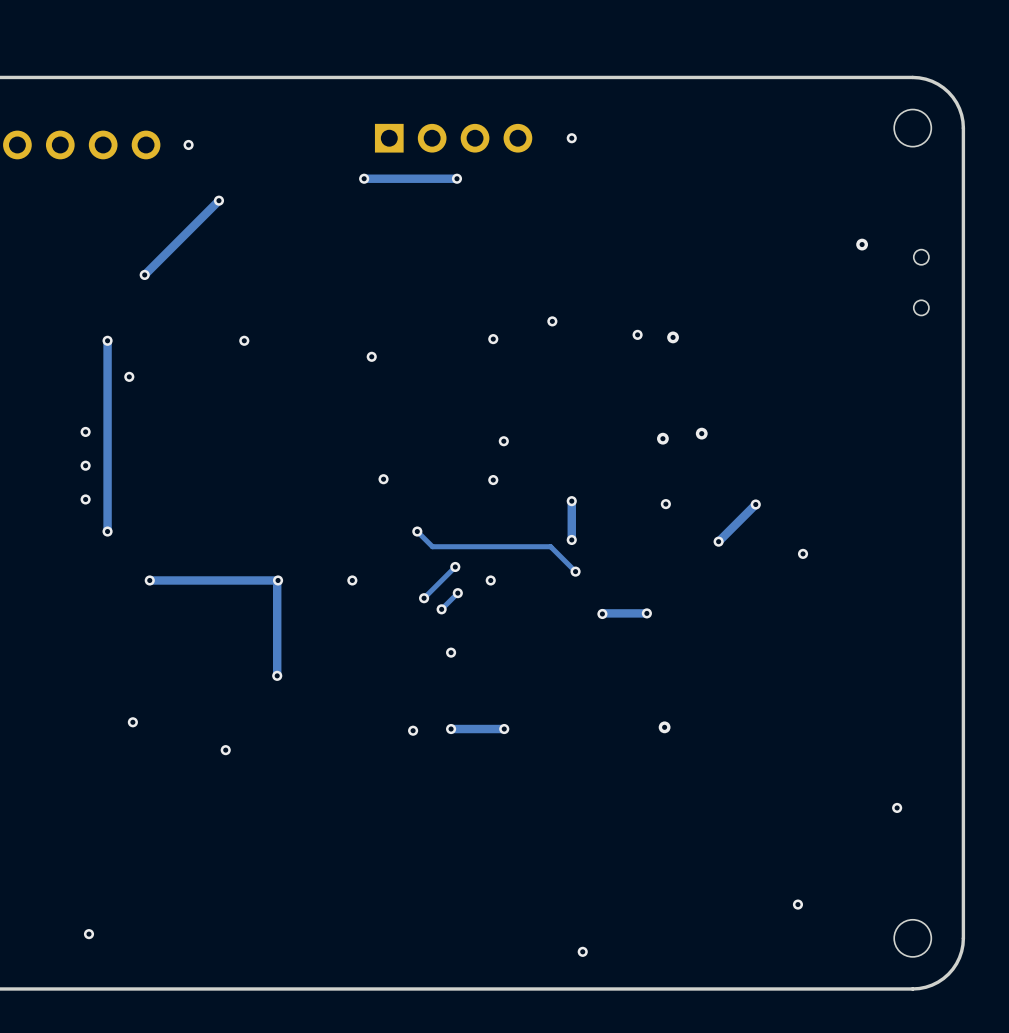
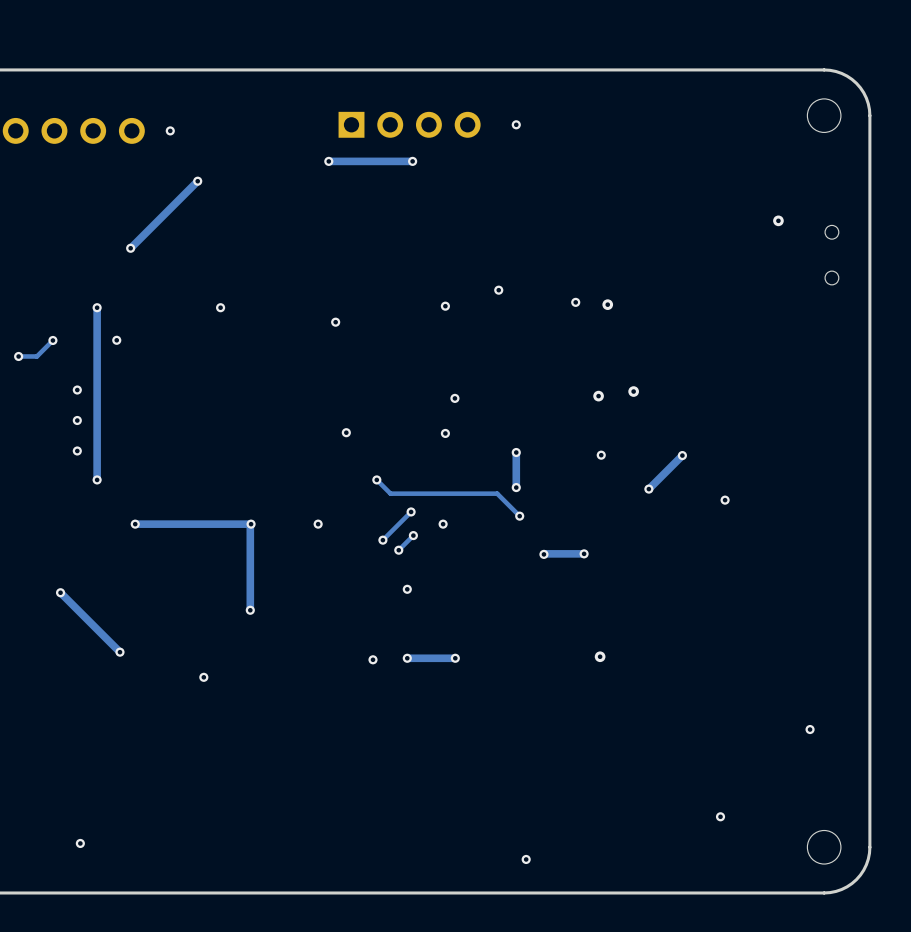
track: none -> (52, 340) (36, 356) (18, 356)
via: none -> (52, 340)
via: none -> (18, 356)
track: none -> (60, 592) (119, 652)
via: none -> (60, 592)

